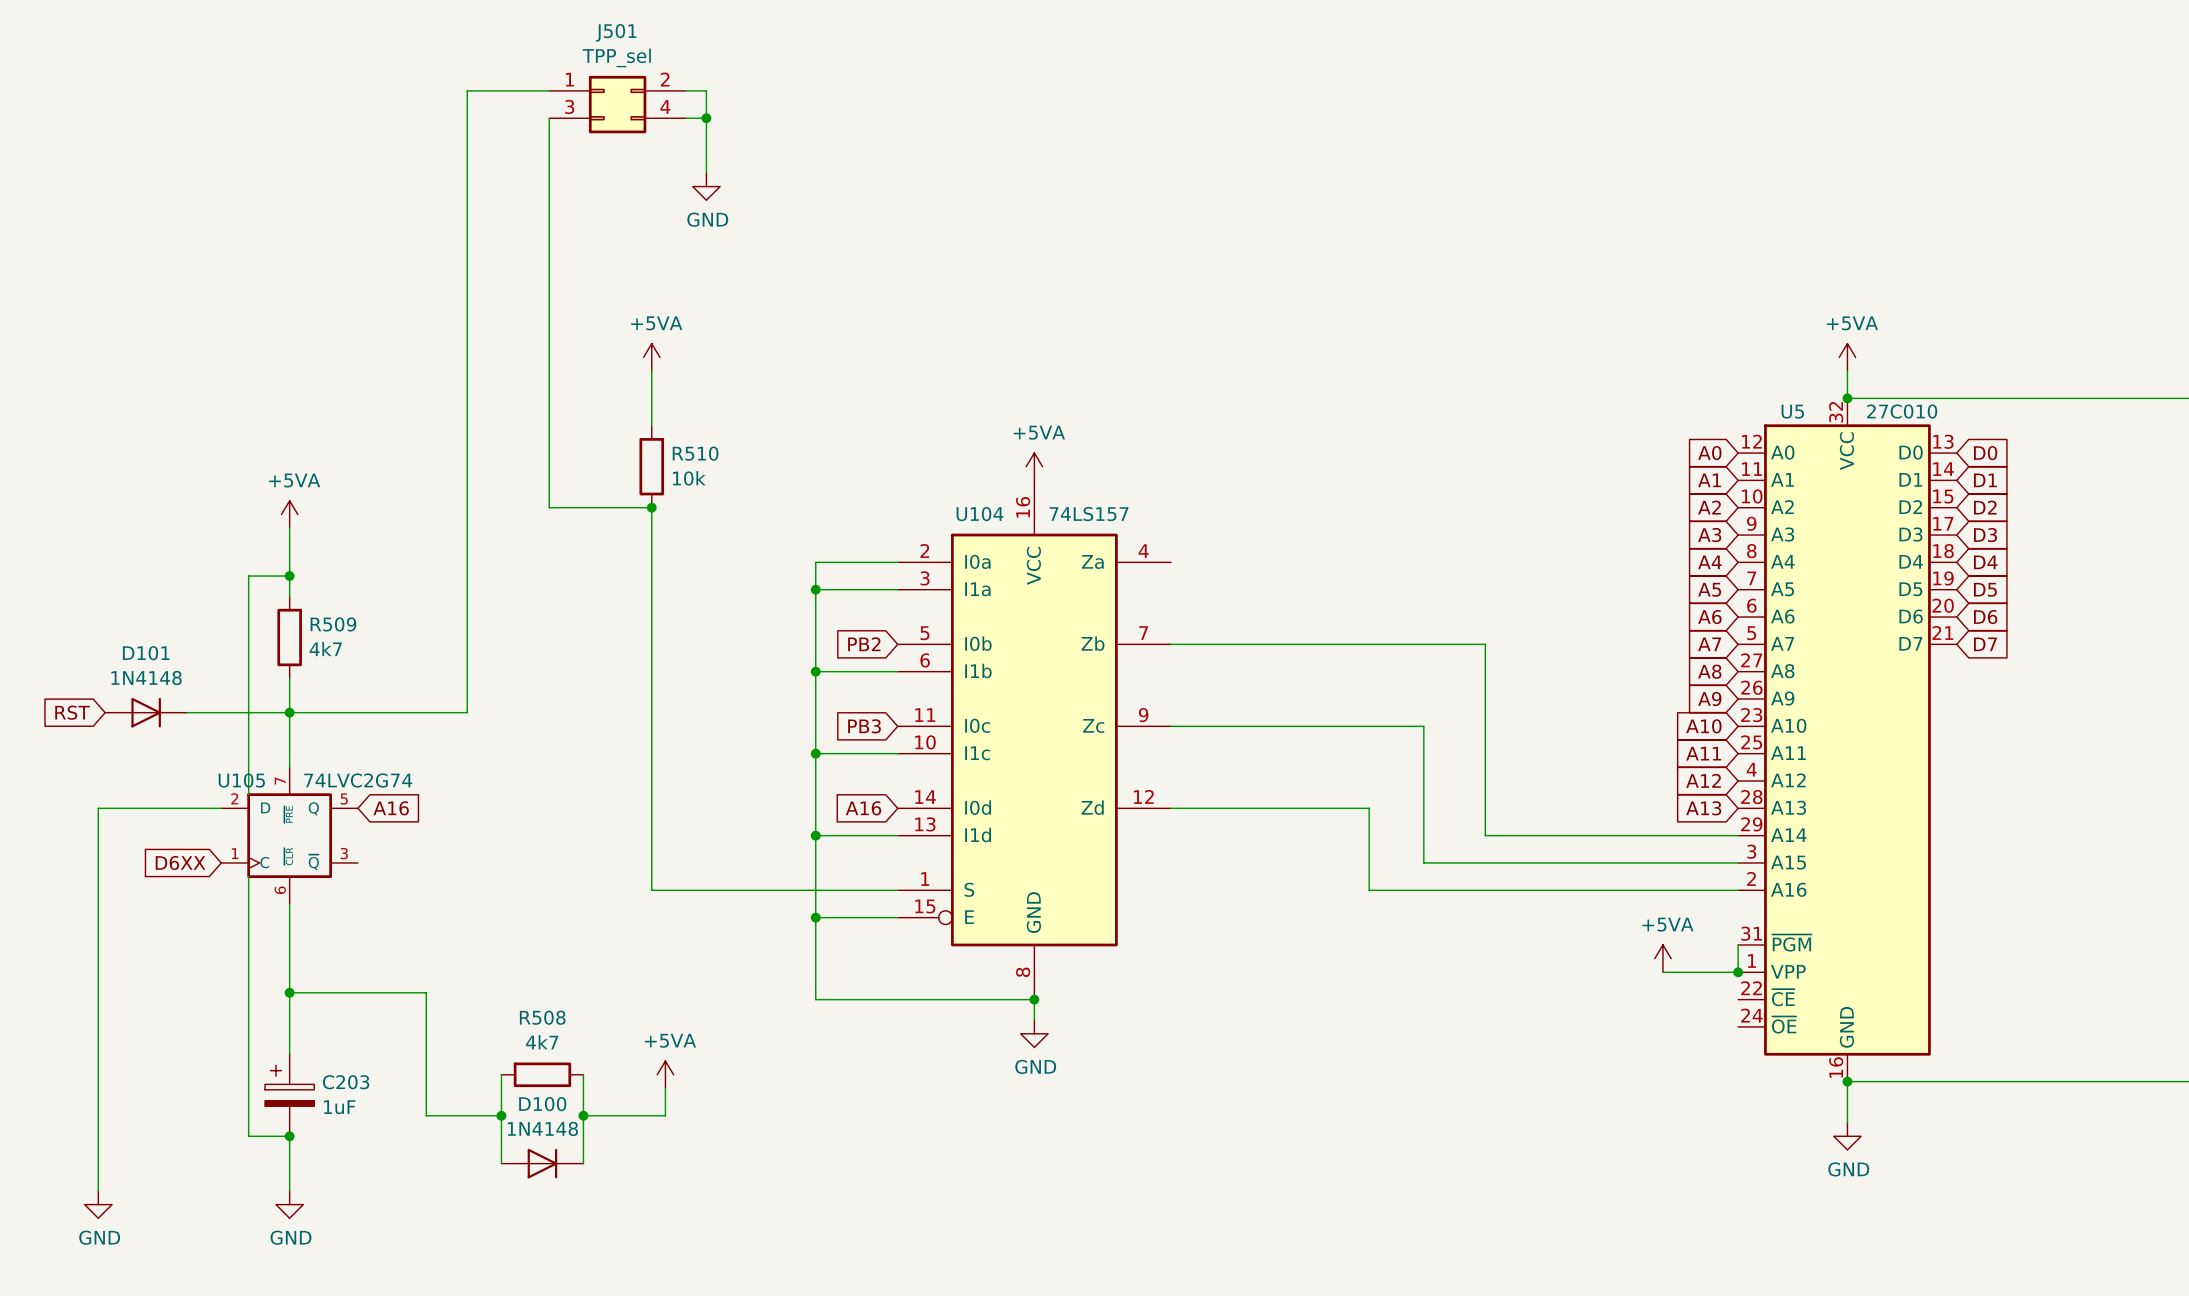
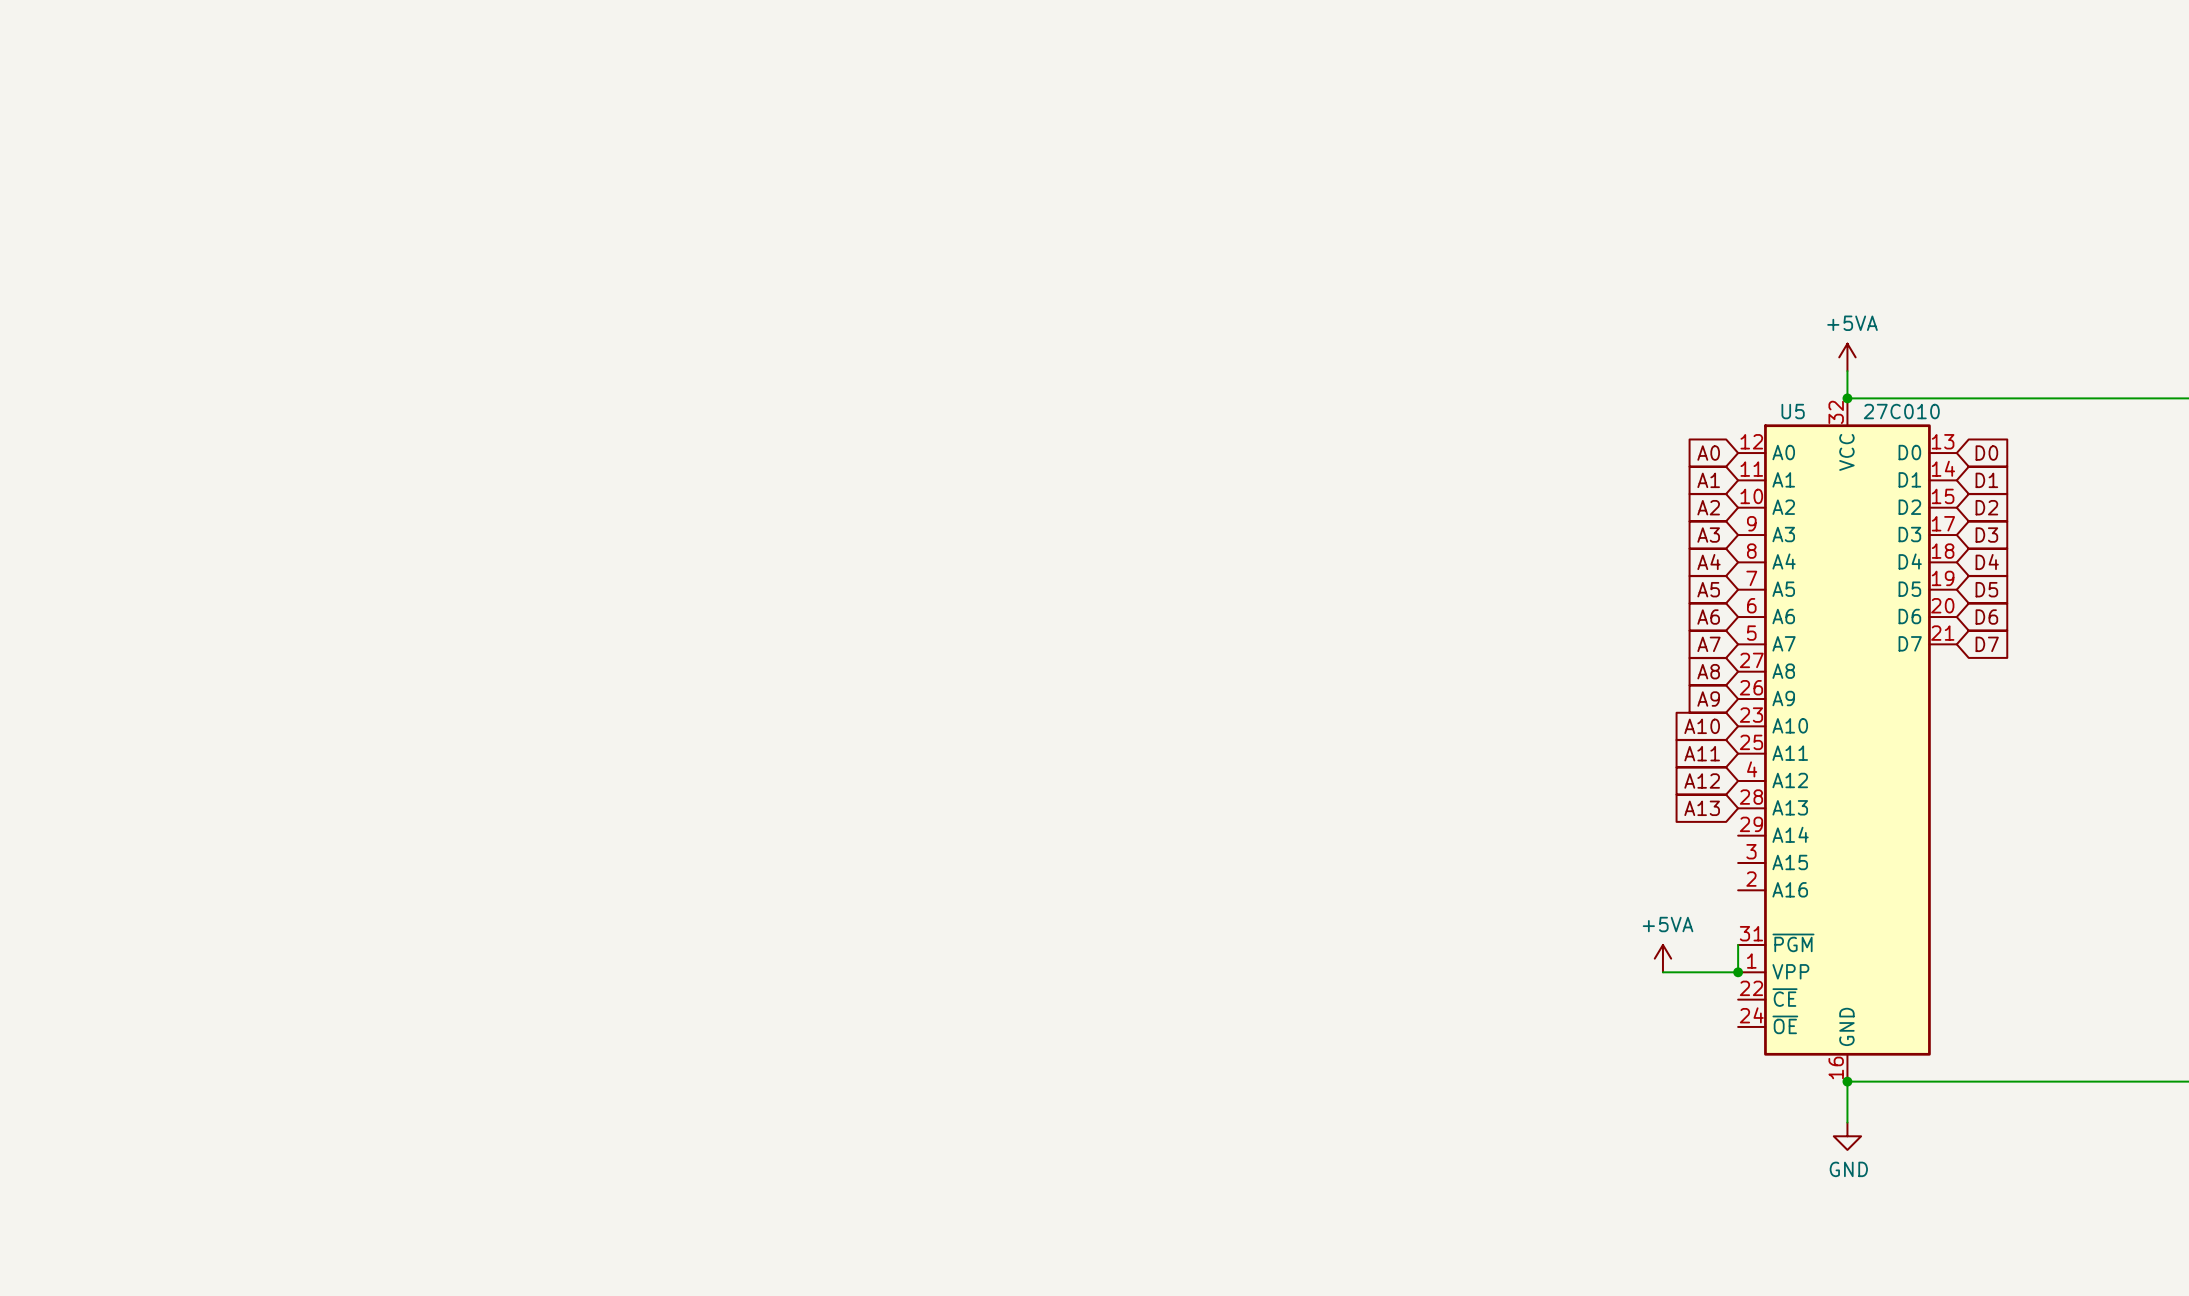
wire: (549, 90) (467, 90) (467, 712) (187, 712) -> none
wire: (685, 90) (706, 90) (706, 172) -> none
J501: TPP_sel (617, 104) -> none
wire: (549, 118) (549, 507) (651, 507) (651, 890) (897, 890) -> none
wire: (685, 118) (706, 118) -> none
junction: (706, 118) -> none
power symbol: GND (706, 186) -> none
power symbol: +5VA (651, 357) -> none
wire: (651, 371) (651, 425) -> none
R510: 10k (651, 466) -> none
power symbol: +5VA (1034, 466) -> none
junction: (651, 507) -> none
power symbol: +5VA (289, 514) -> none
wire: (289, 528) (289, 596) -> none
wire: (897, 562) (815, 562) (815, 999) (1034, 999) (1034, 1020) -> none
wire: (289, 576) (248, 576) (248, 794) -> none
junction: (289, 576) -> none
wire: (815, 589) (897, 589) -> none
junction: (815, 589) -> none
R509: 4k7 (289, 637) -> none
global label: PB2 (864, 644) -> none
wire: (1171, 644) (1485, 644) (1485, 835) (1738, 835) -> none
wire: (815, 671) (897, 671) -> none
junction: (815, 671) -> none
wire: (289, 678) (289, 767) -> none
global label: RST (72, 712) -> none
D101: 1N4148 (146, 712) -> none
junction: (289, 712) -> none
global label: PB3 (864, 726) -> none
wire: (1171, 726) (1423, 726) (1423, 862) (1738, 862) -> none
U104: 74LS157 (1034, 740) -> none
wire: (815, 753) (897, 753) -> none
junction: (815, 753) -> none
wire: (221, 808) (98, 808) (98, 1190) -> none
global label: A16 (391, 808) -> none
global label: A16 (863, 808) -> none
wire: (1171, 808) (1369, 808) (1369, 890) (1738, 890) -> none
U105: 74LVC2G74 (289, 835) -> none
wire: (815, 835) (897, 835) -> none
junction: (815, 835) -> none
global label: D6XX (180, 863) -> none
wire: (248, 876) (248, 1136) (289, 1136) (289, 1190) -> none
wire: (289, 903) (289, 1054) -> none
wire: (815, 917) (897, 917) -> none
junction: (815, 917) -> none
wire: (289, 992) (426, 992) (426, 1115) (501, 1115) -> none
junction: (289, 992) -> none
junction: (1034, 999) -> none
power symbol: GND (1034, 1033) -> none
wire: (501, 1074) (501, 1163) -> none
R508: 4k7 (542, 1074) -> none
wire: (583, 1074) (583, 1163) -> none
power symbol: +5VA (665, 1074) -> none
wire: (665, 1088) (665, 1115) (583, 1115) -> none
C203: 1uF (289, 1095) -> none
junction: (501, 1115) -> none
junction: (583, 1115) -> none
junction: (289, 1136) -> none
D100: 1N4148 (542, 1163) -> none
power symbol: GND (98, 1204) -> none
power symbol: GND (289, 1204) -> none

